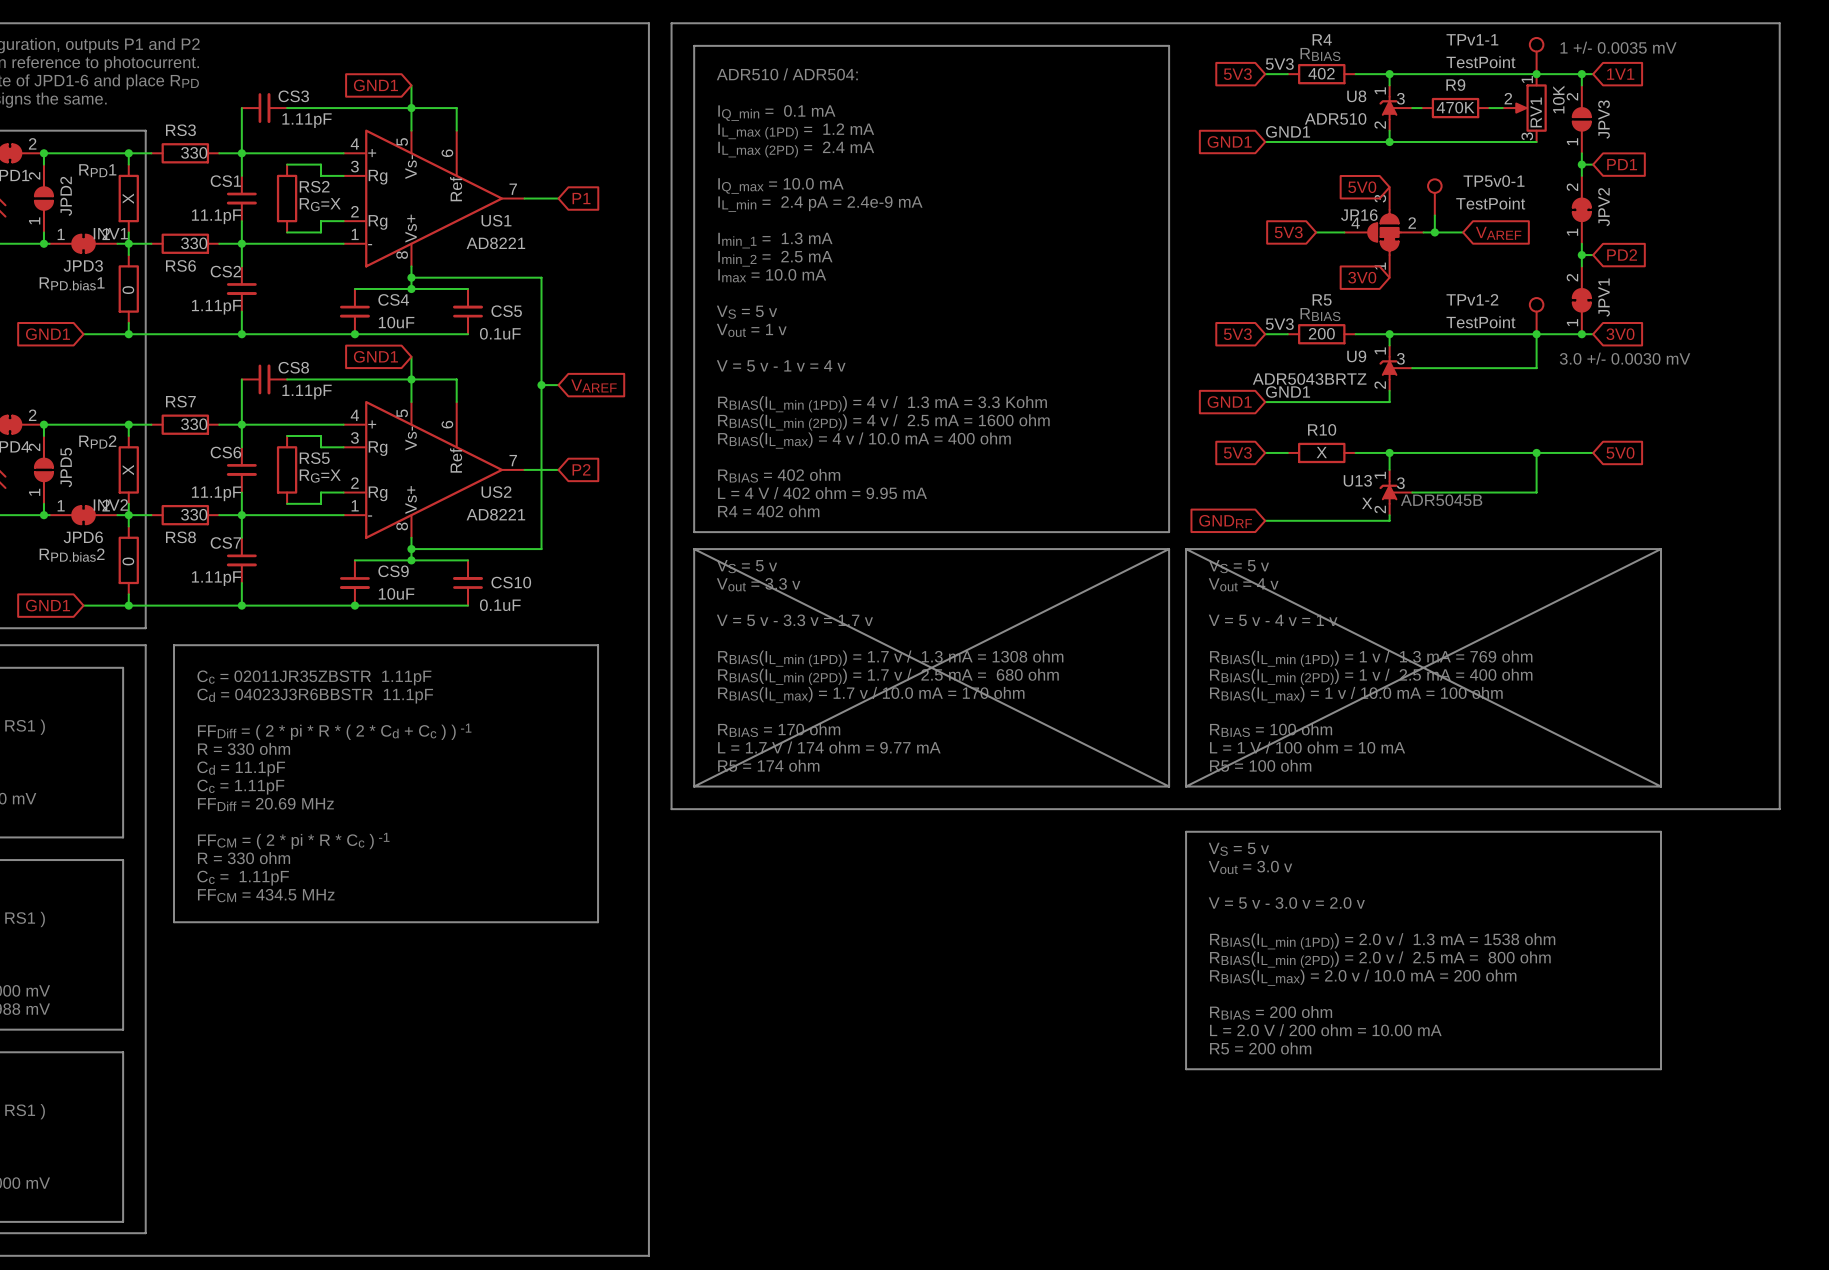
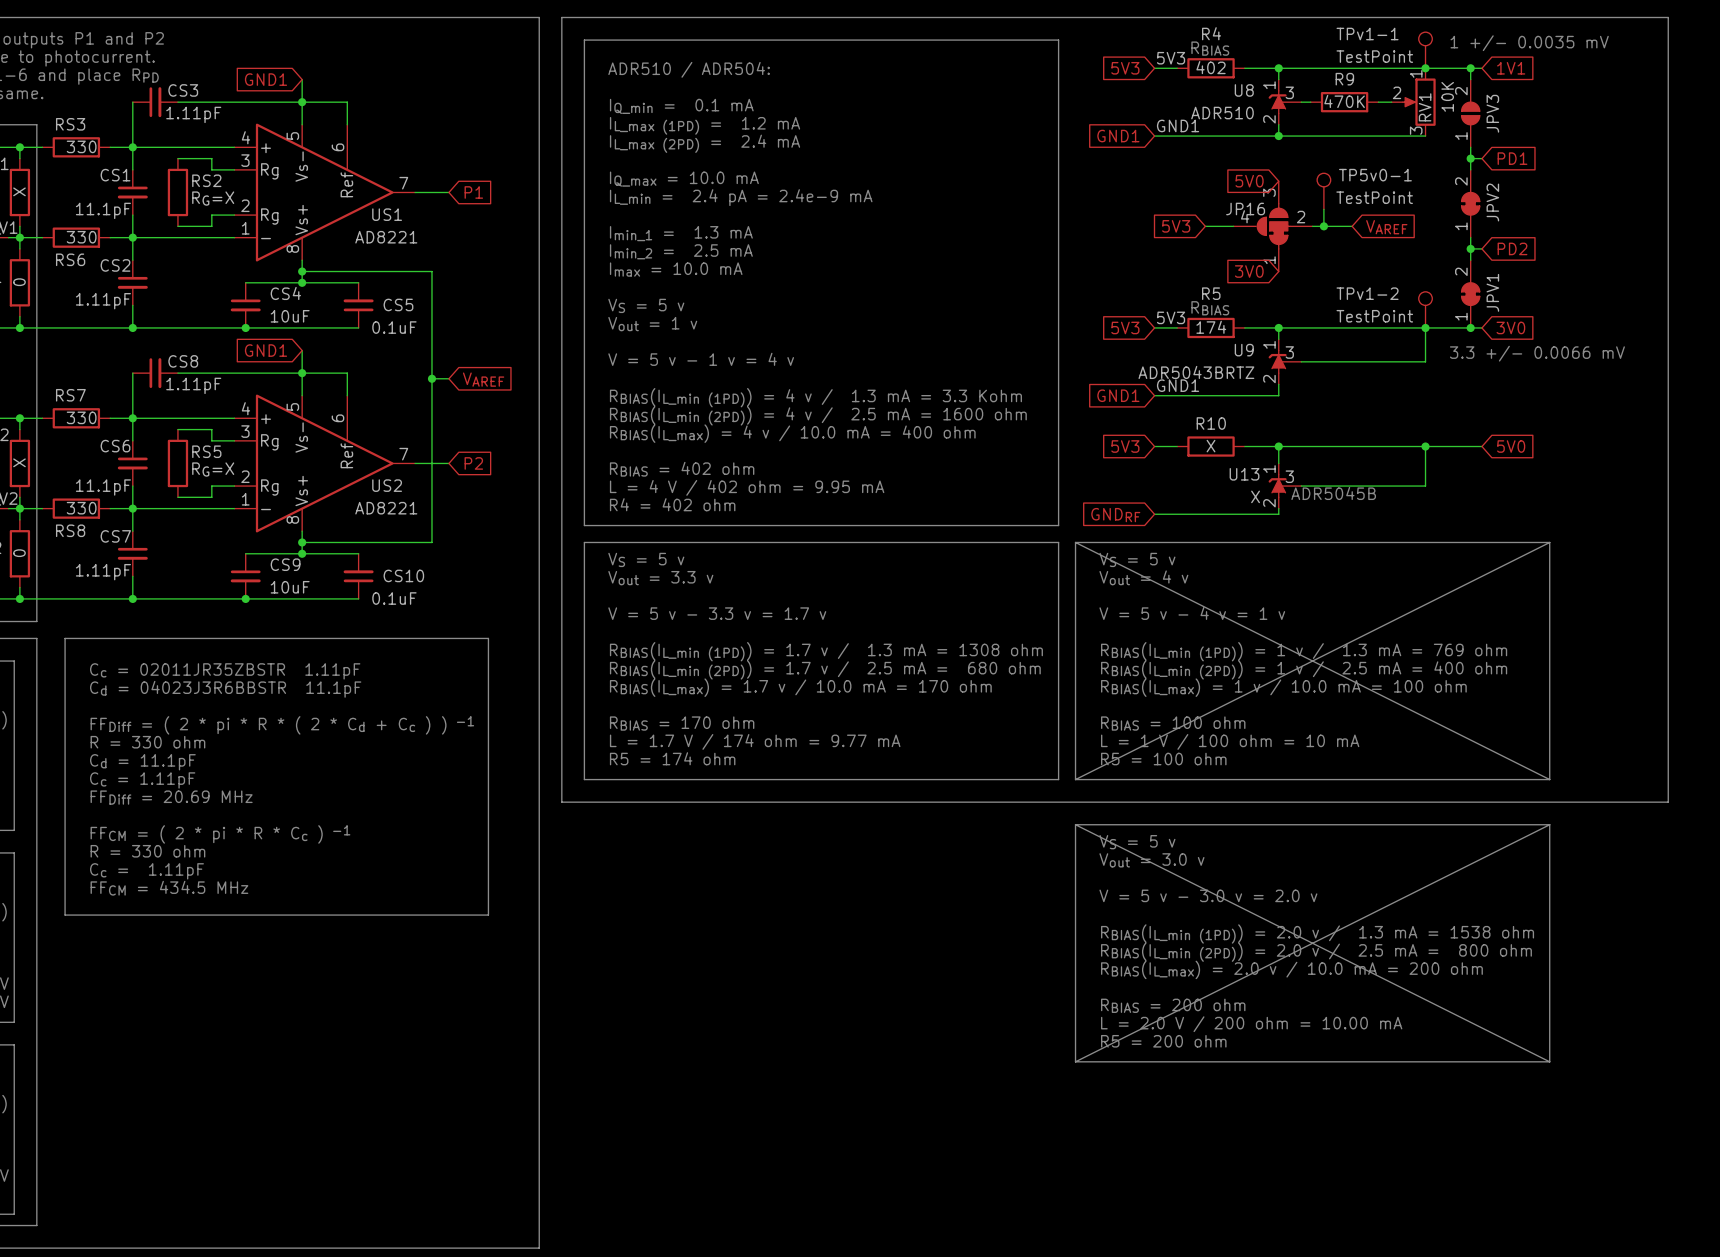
R5 value: 200 (1321, 333) -> 174 (1211, 327)
text: 3.0 +/- 0.0030 mV (1625, 358) -> 3.3 +/- 0.0066 mV (1537, 353)
line: (694, 549) (1169, 786) -> none
line: (1169, 549) (694, 786) -> none
line: none -> (1075, 824) (1549, 1061)
line: none -> (1549, 824) (1075, 1061)

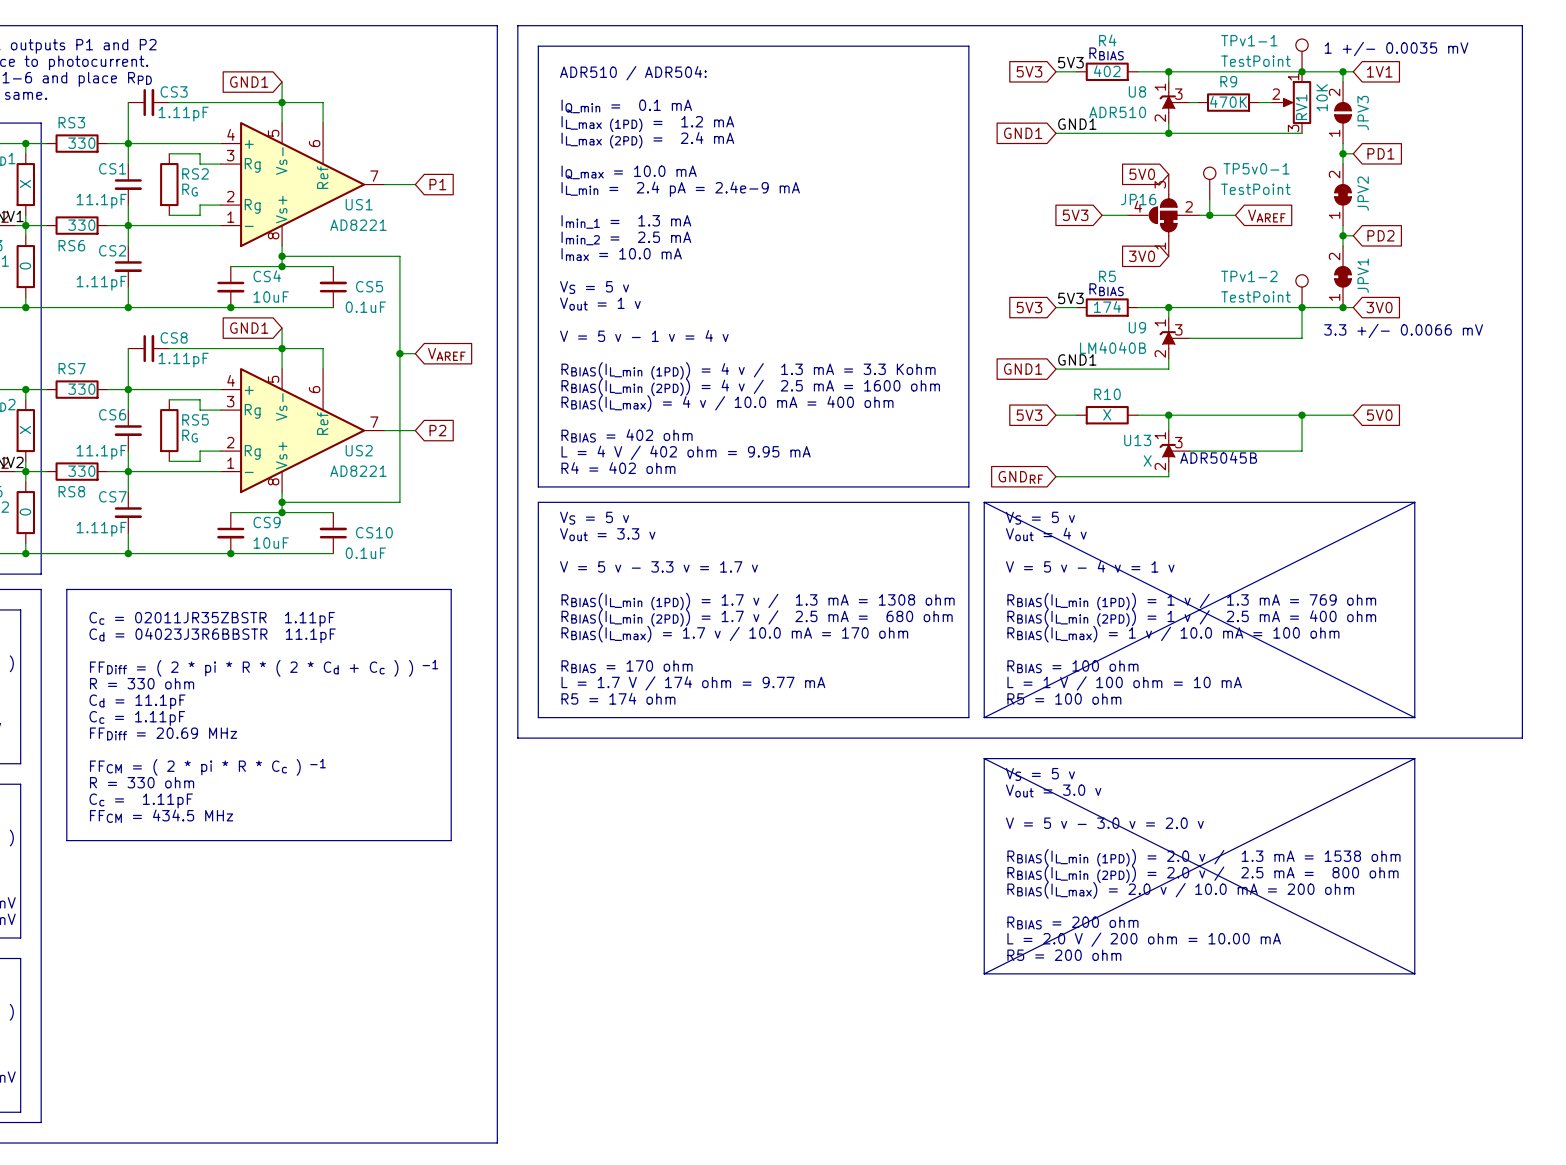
RS2 value: RG=X (213, 198) -> RG (190, 190)
U9 value: ADR5043BRTZ (1196, 372) -> LM4040B (1113, 347)
RS5 value: RG=X (213, 469) -> RG (190, 436)

